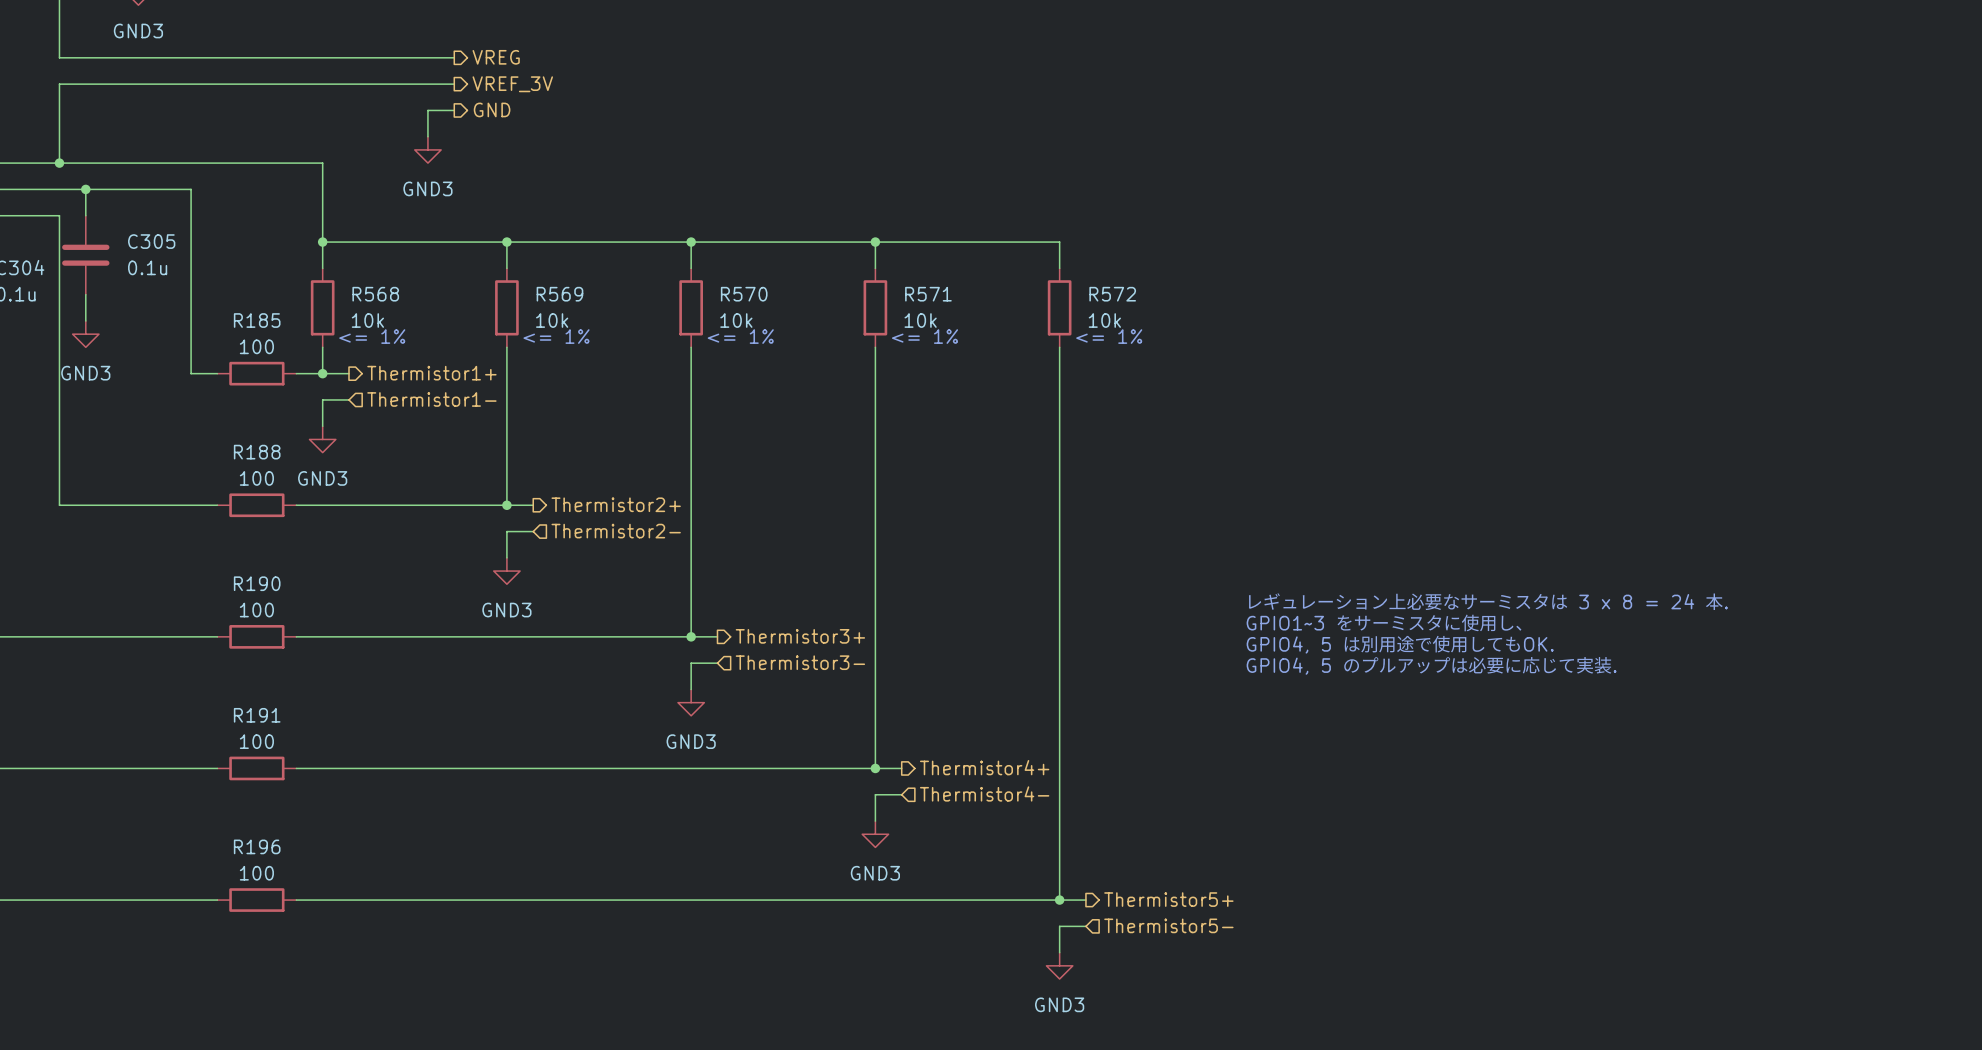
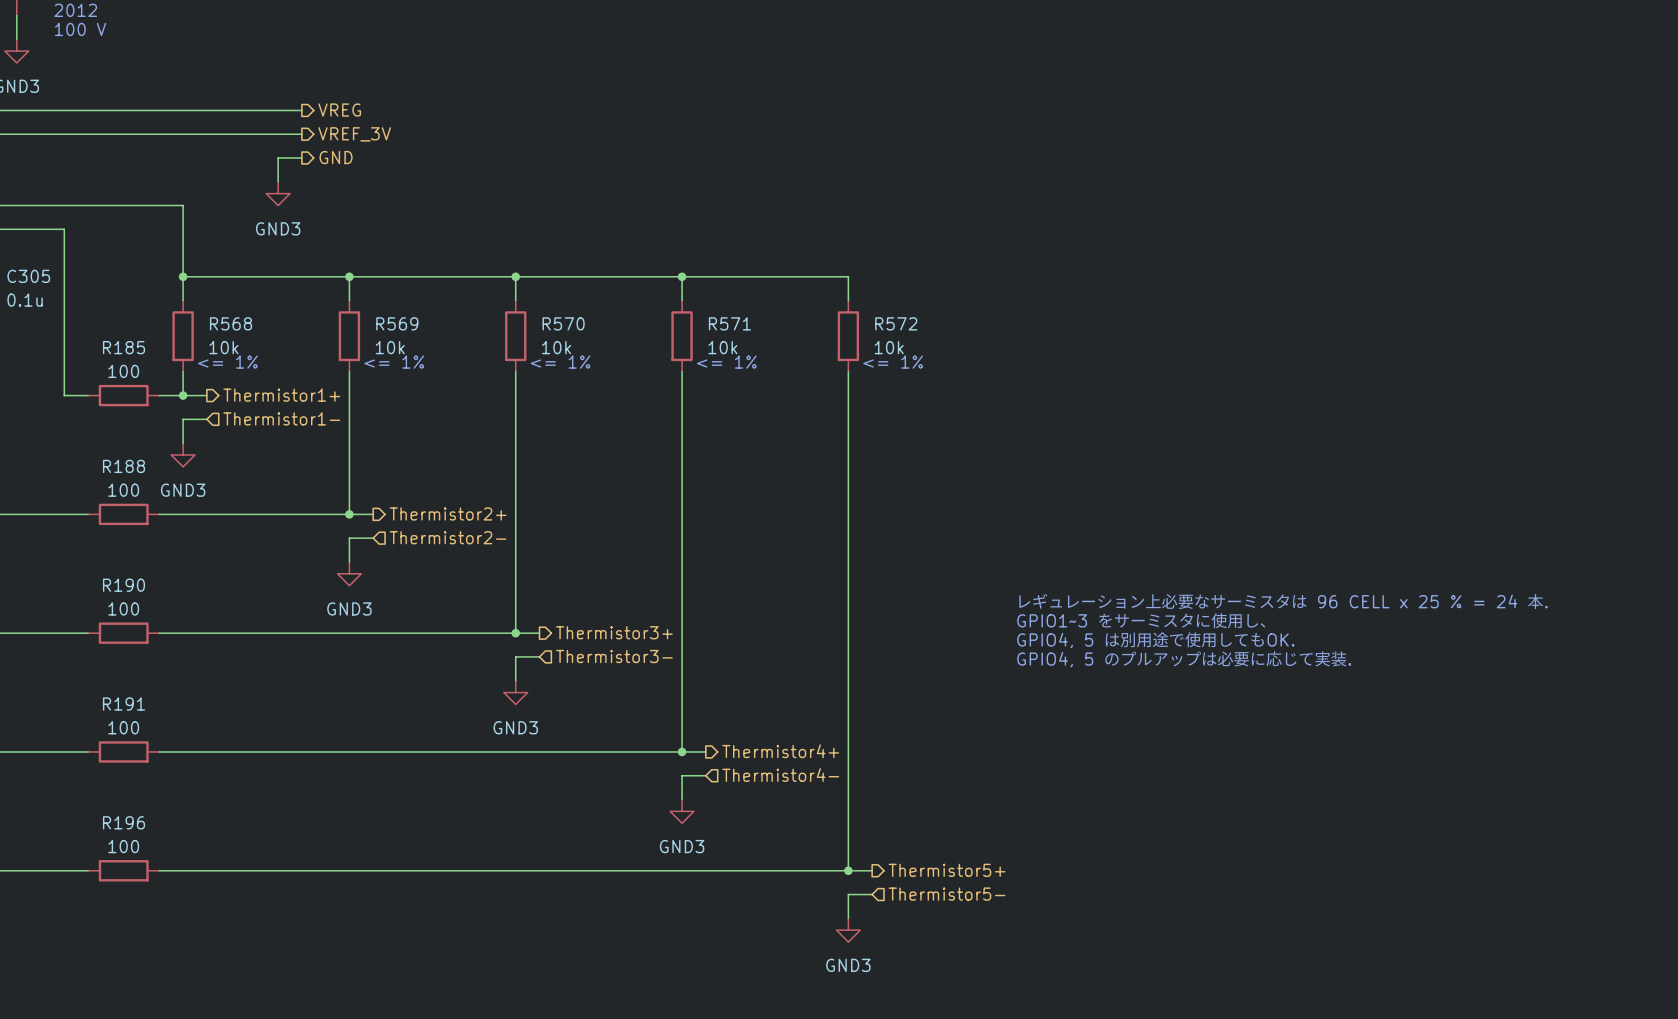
text: レギュレーション上必要なサーミスタは 3 x 8 = 24 本. (1487, 601) -> レギュレーション上必要なサーミスタは 96 CELL x 25 % = 24 本. (1283, 601)

